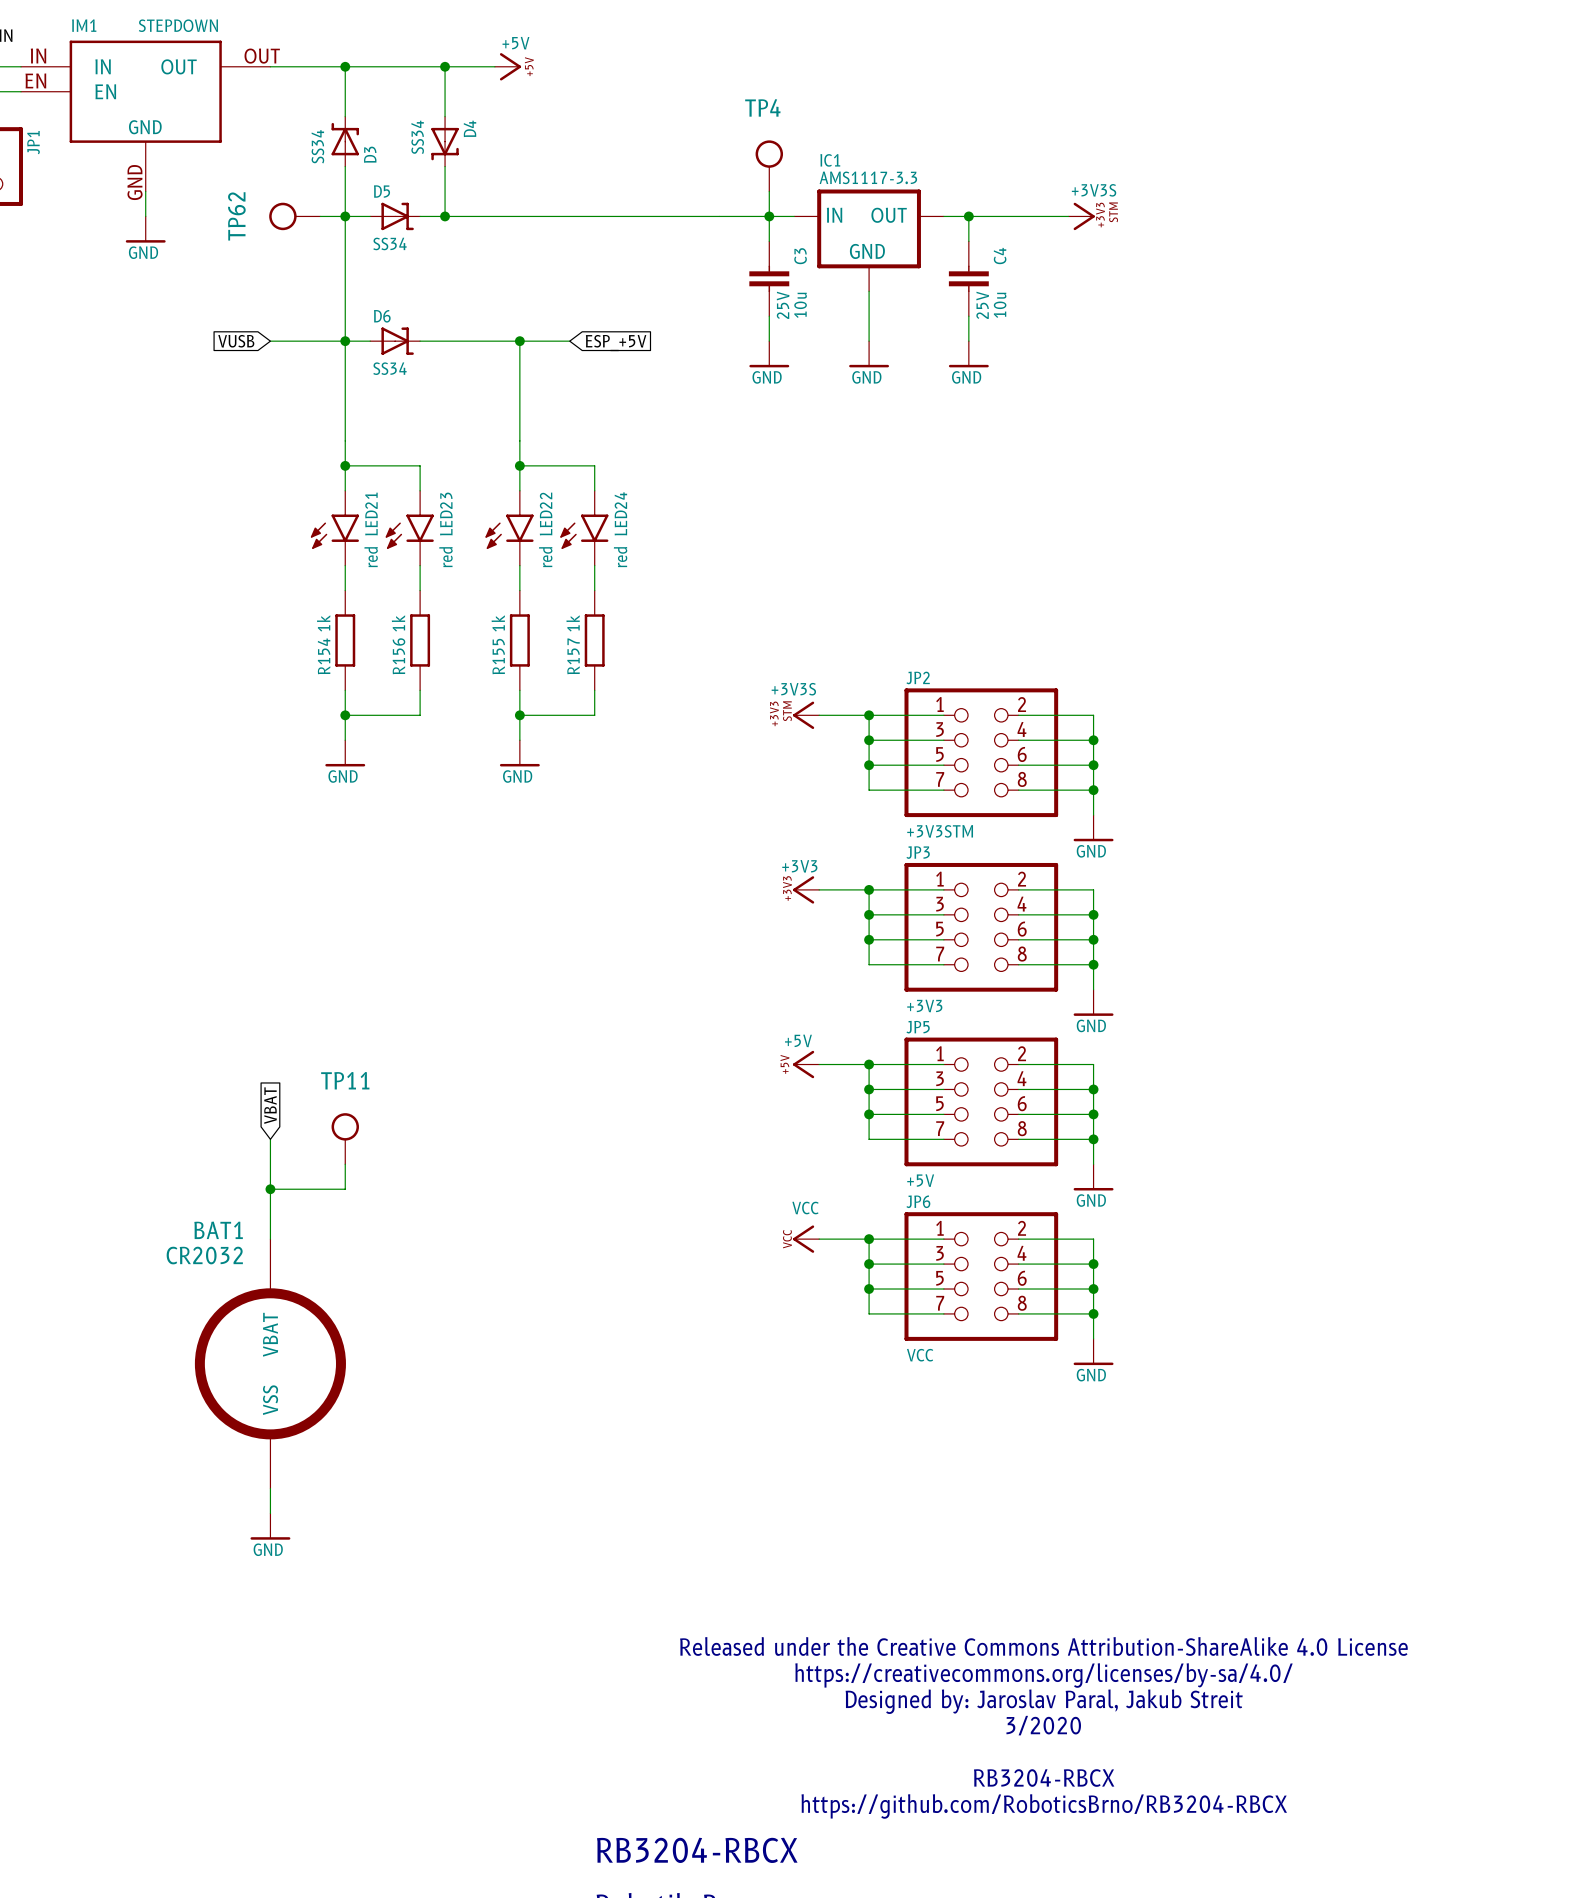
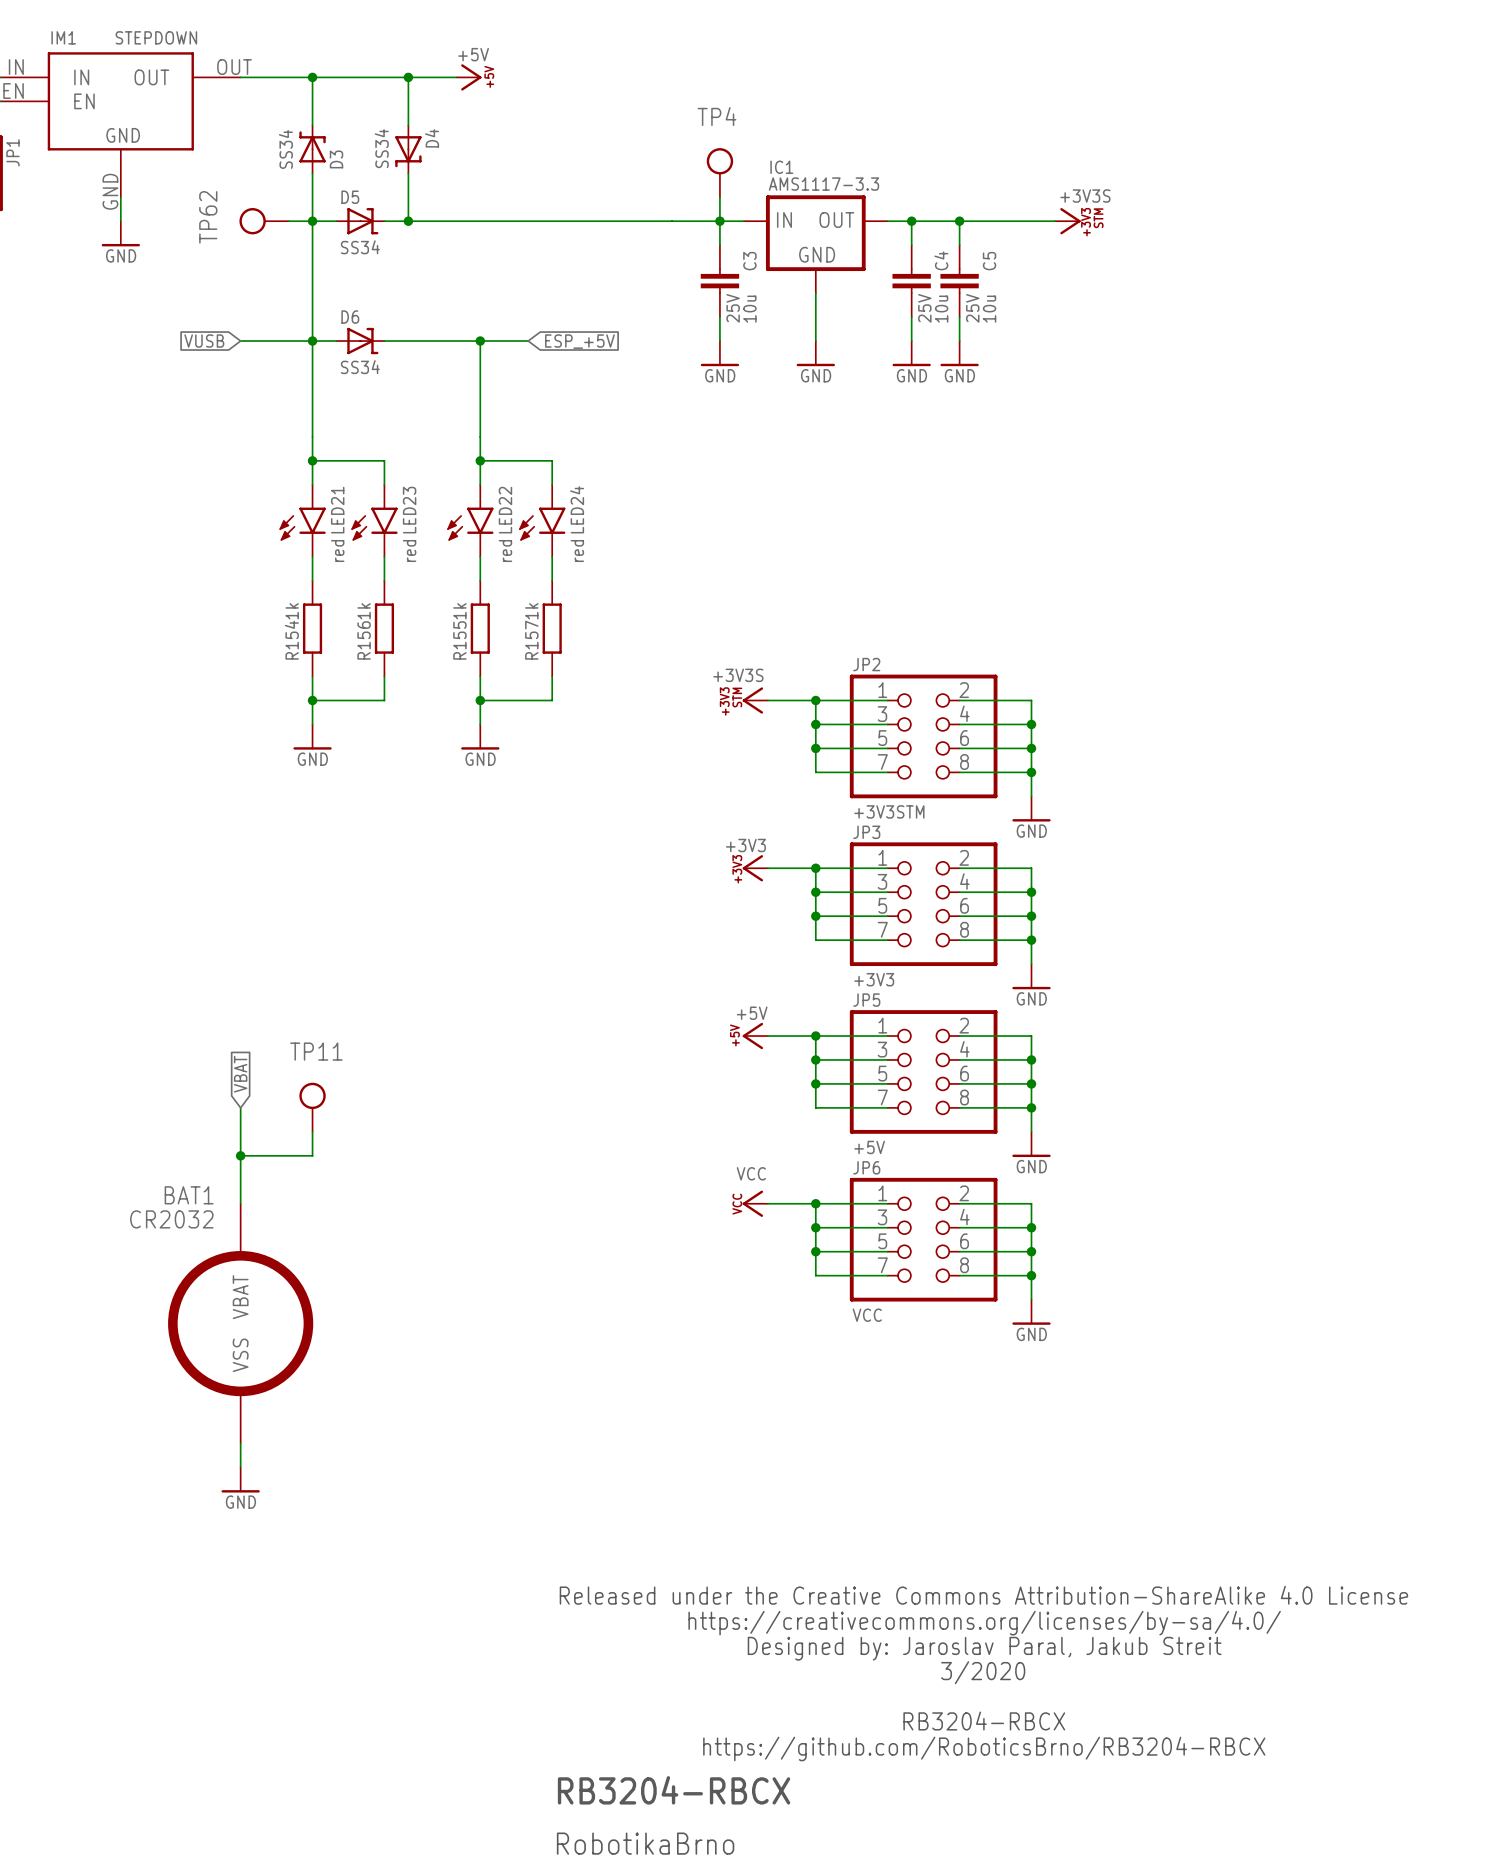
wire: none -> (959, 221) (959, 245)
junction: none -> (959, 221)
power symbol position: +3V3S (1081, 216) -> +3V3S (1068, 221)
C5: none -> 10u (959, 281)
wire: none -> (959, 317) (959, 341)
power symbol: none -> GND (959, 353)

